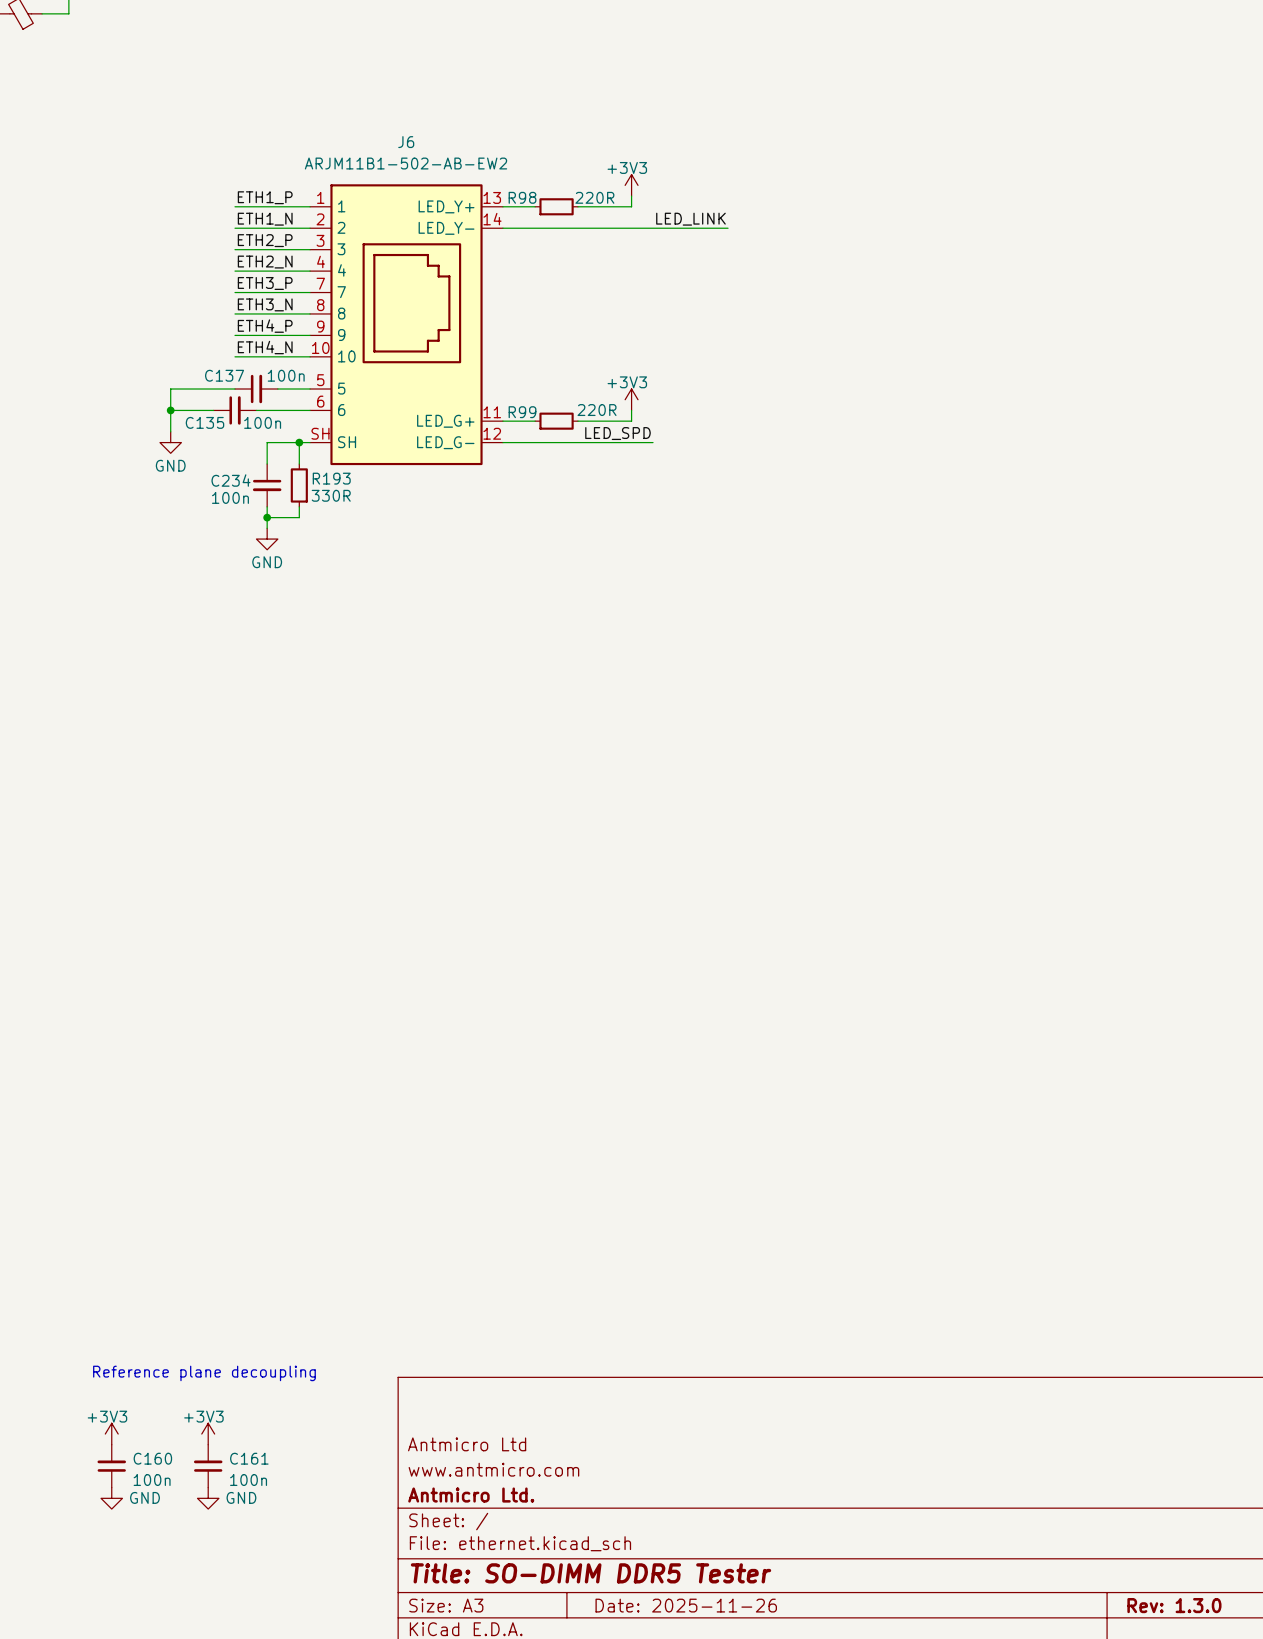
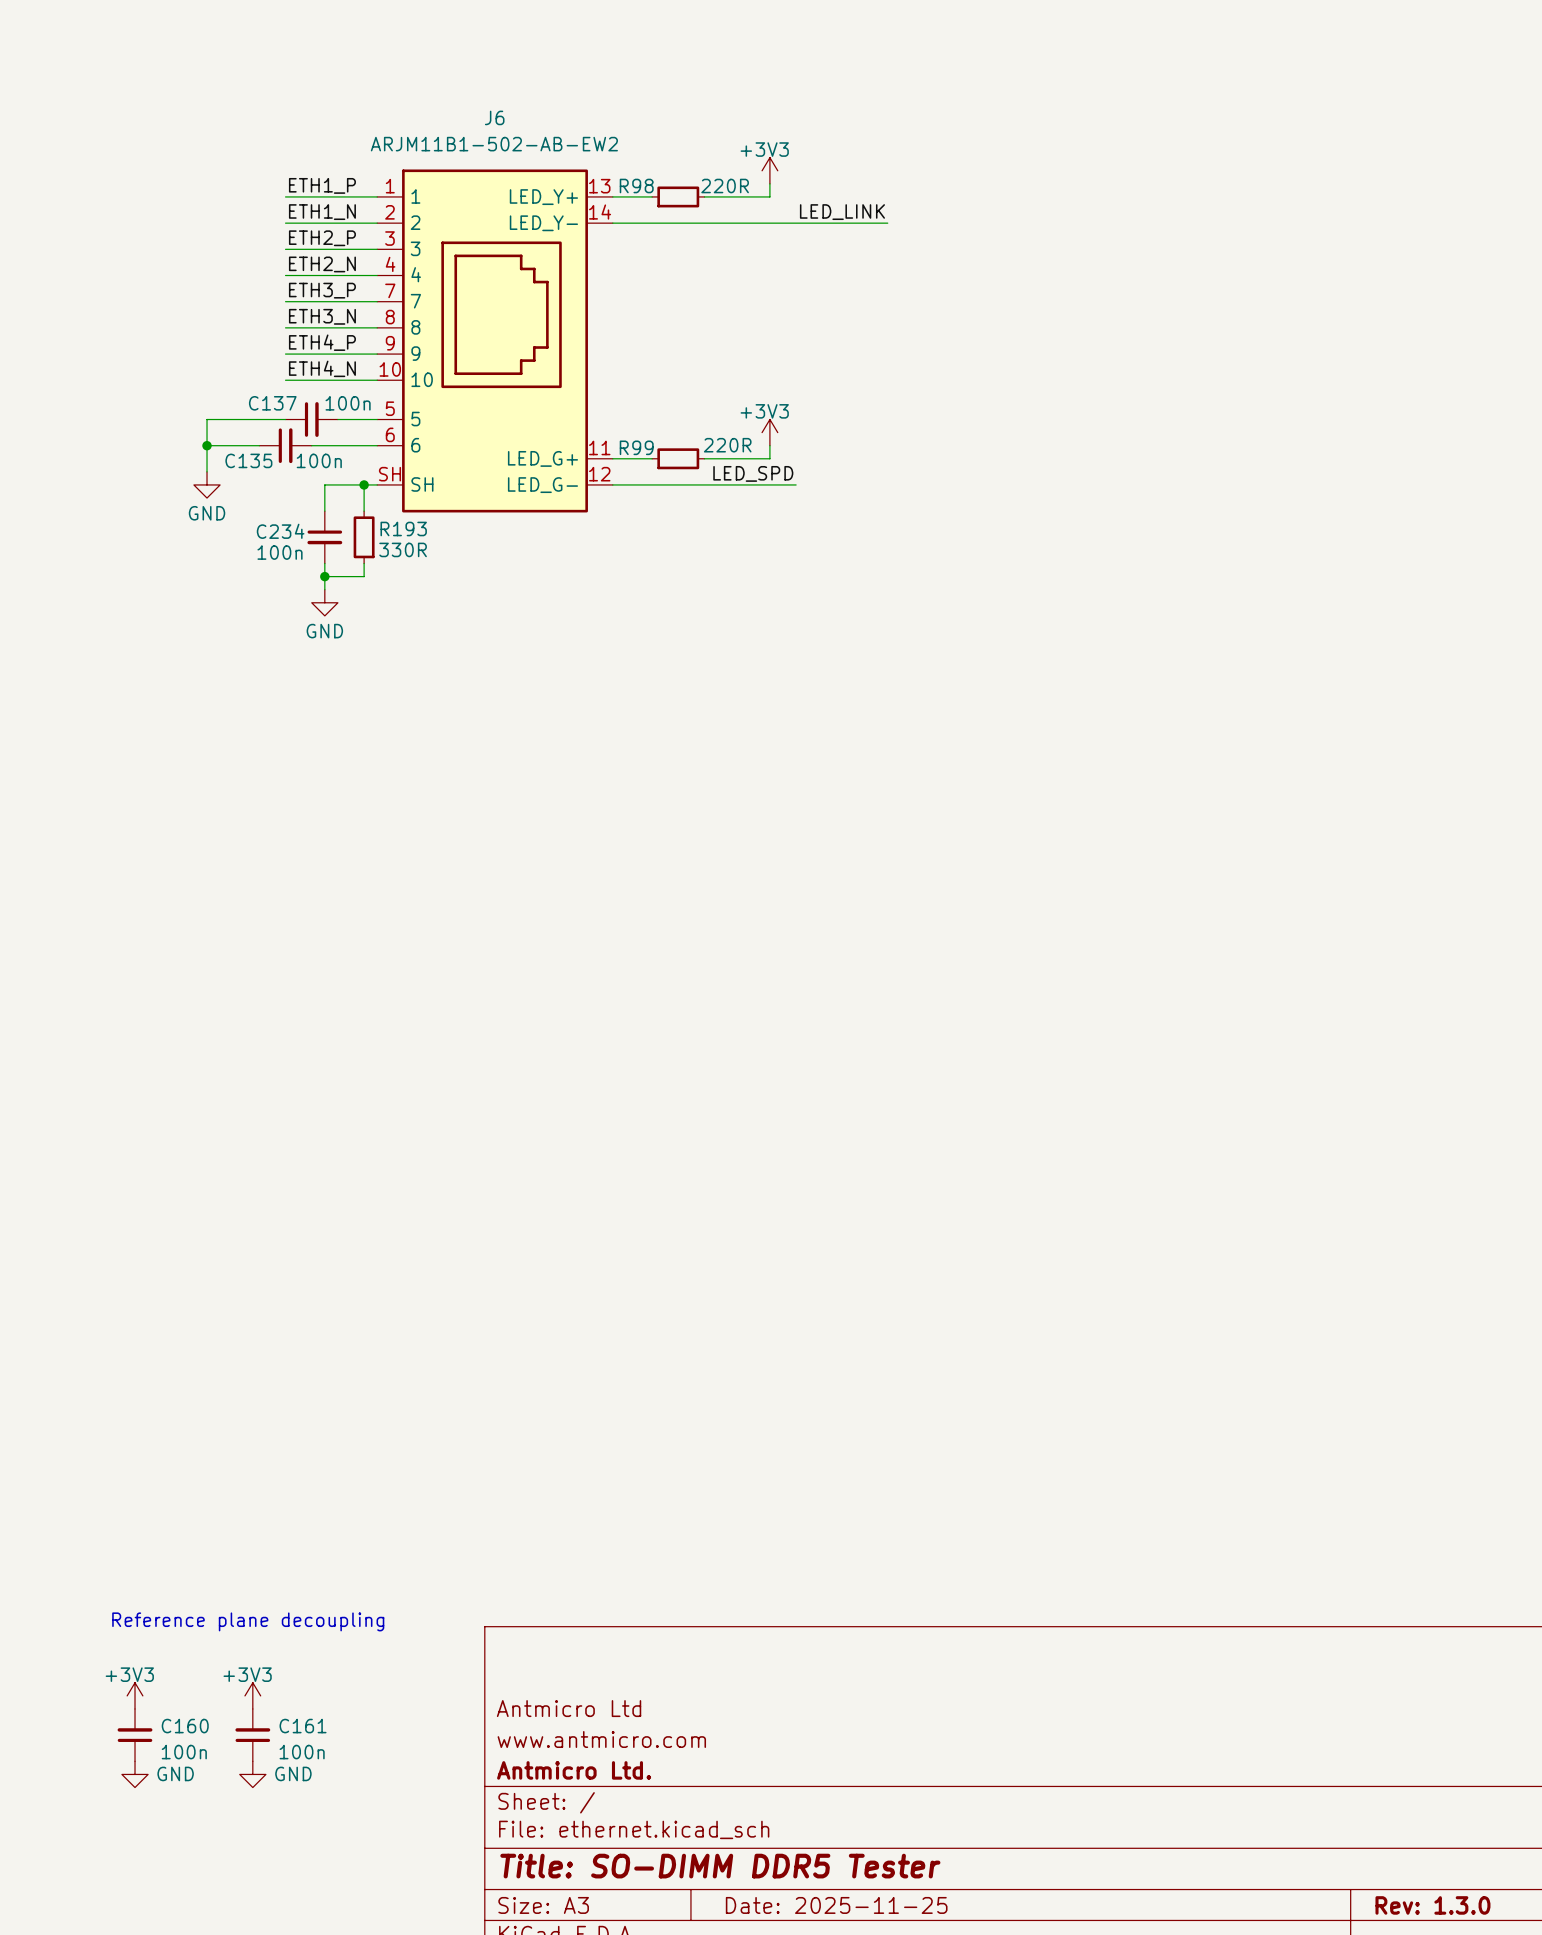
title block: Date: 2025-11-26 (686, 1605) -> Date: 2025-11-25 (836, 1905)

